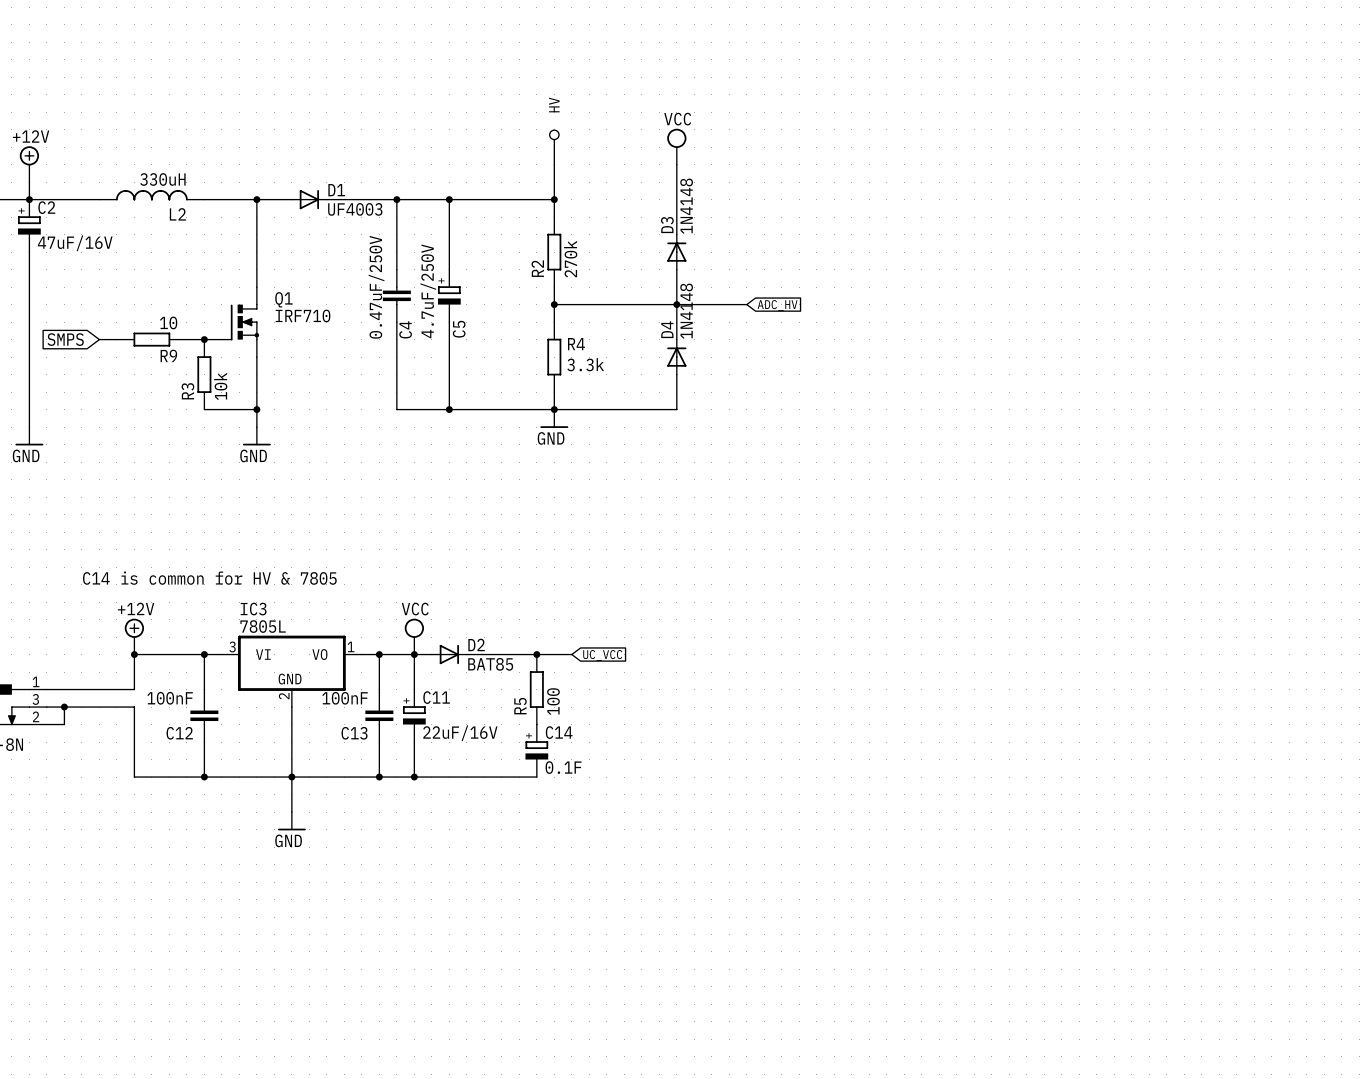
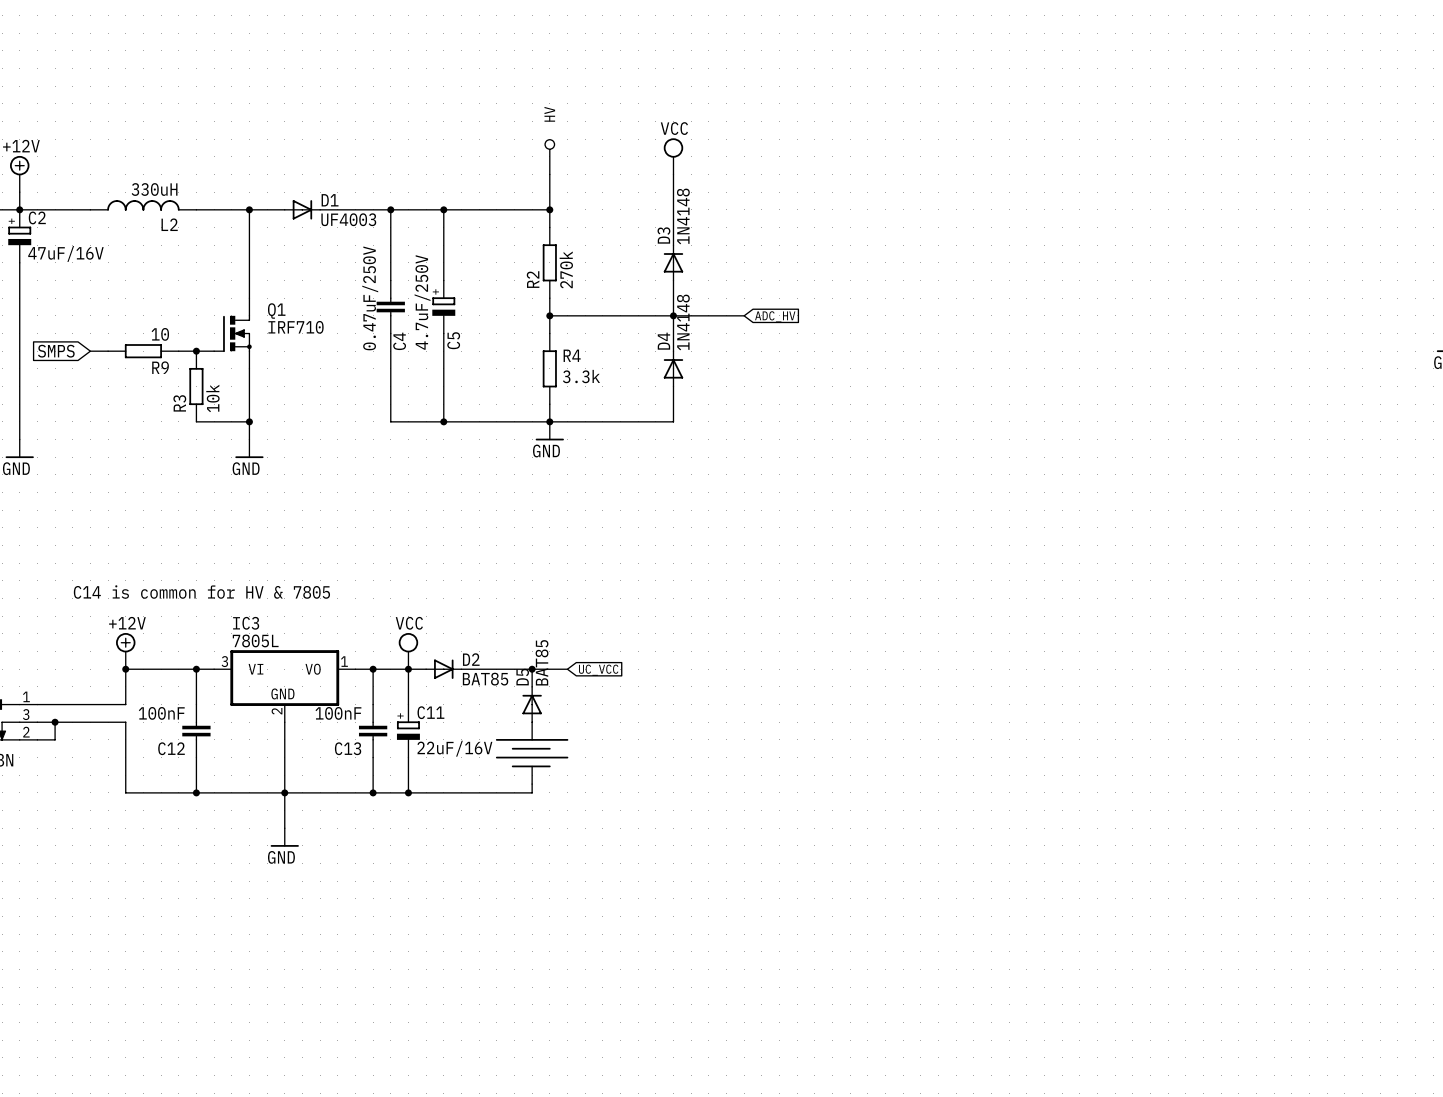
R5: 100 (536, 689) -> none
D5: none -> BAT85 (532, 704)
part: none -> (532, 753)
C14: 0.1F (536, 750) -> none

